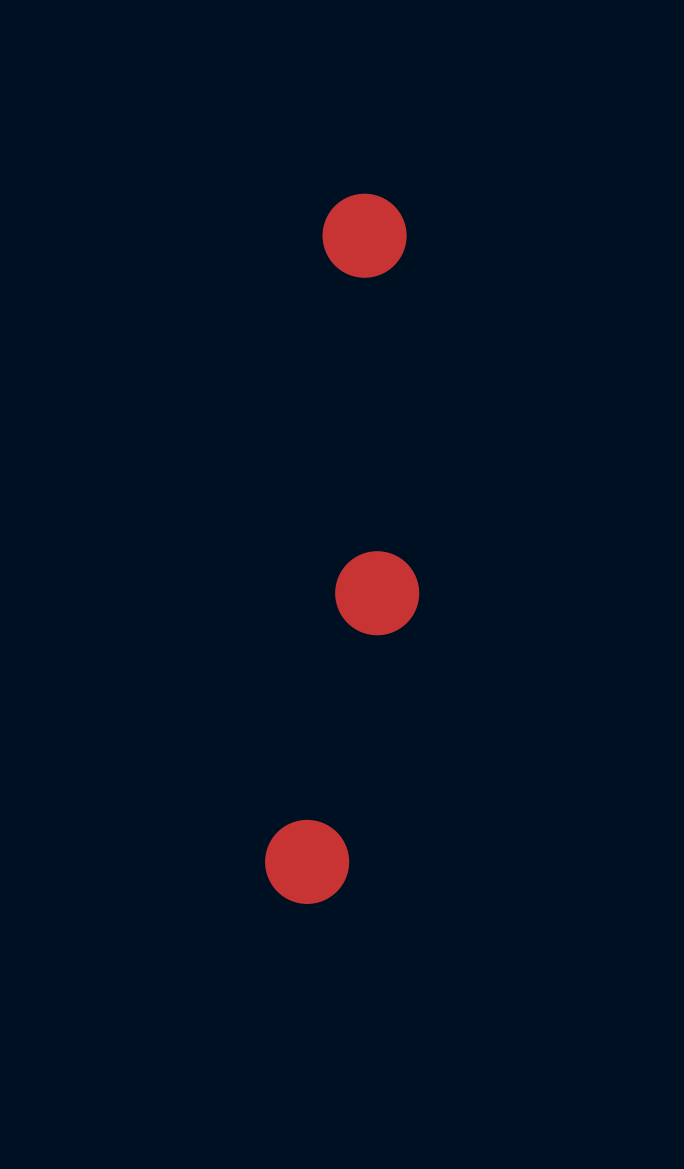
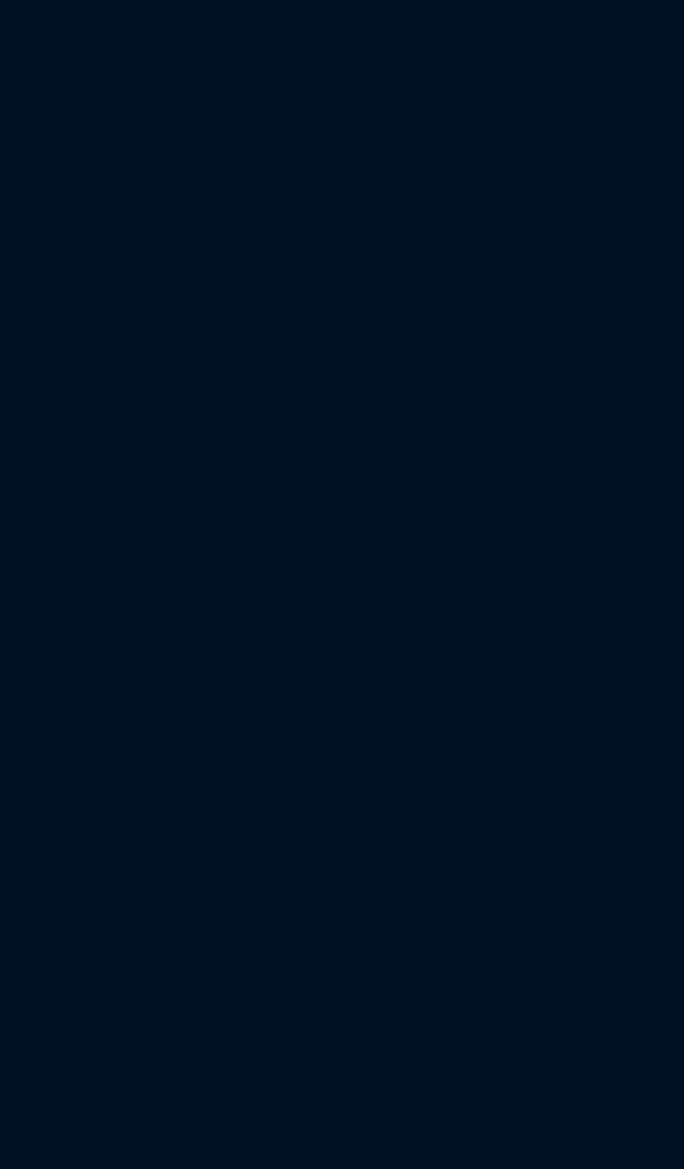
part: (364, 235) -> none
part: (377, 593) -> none
part: (307, 861) -> none

